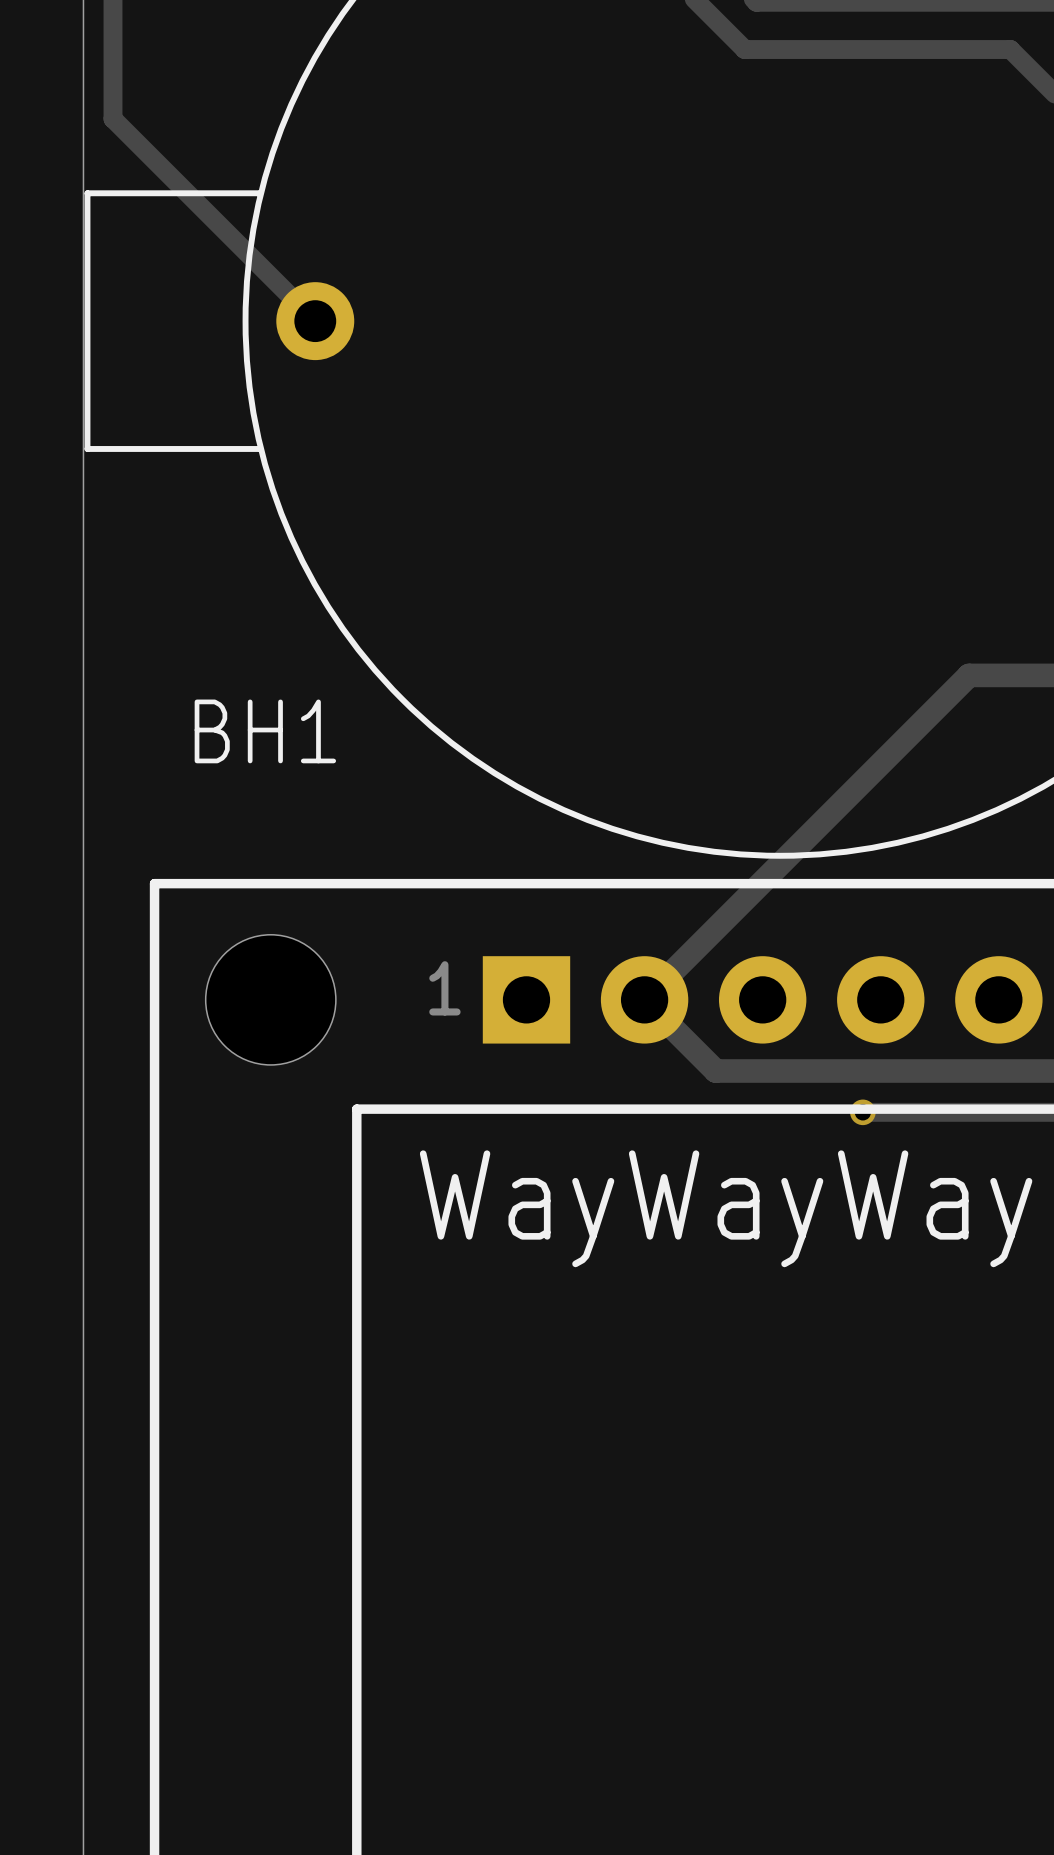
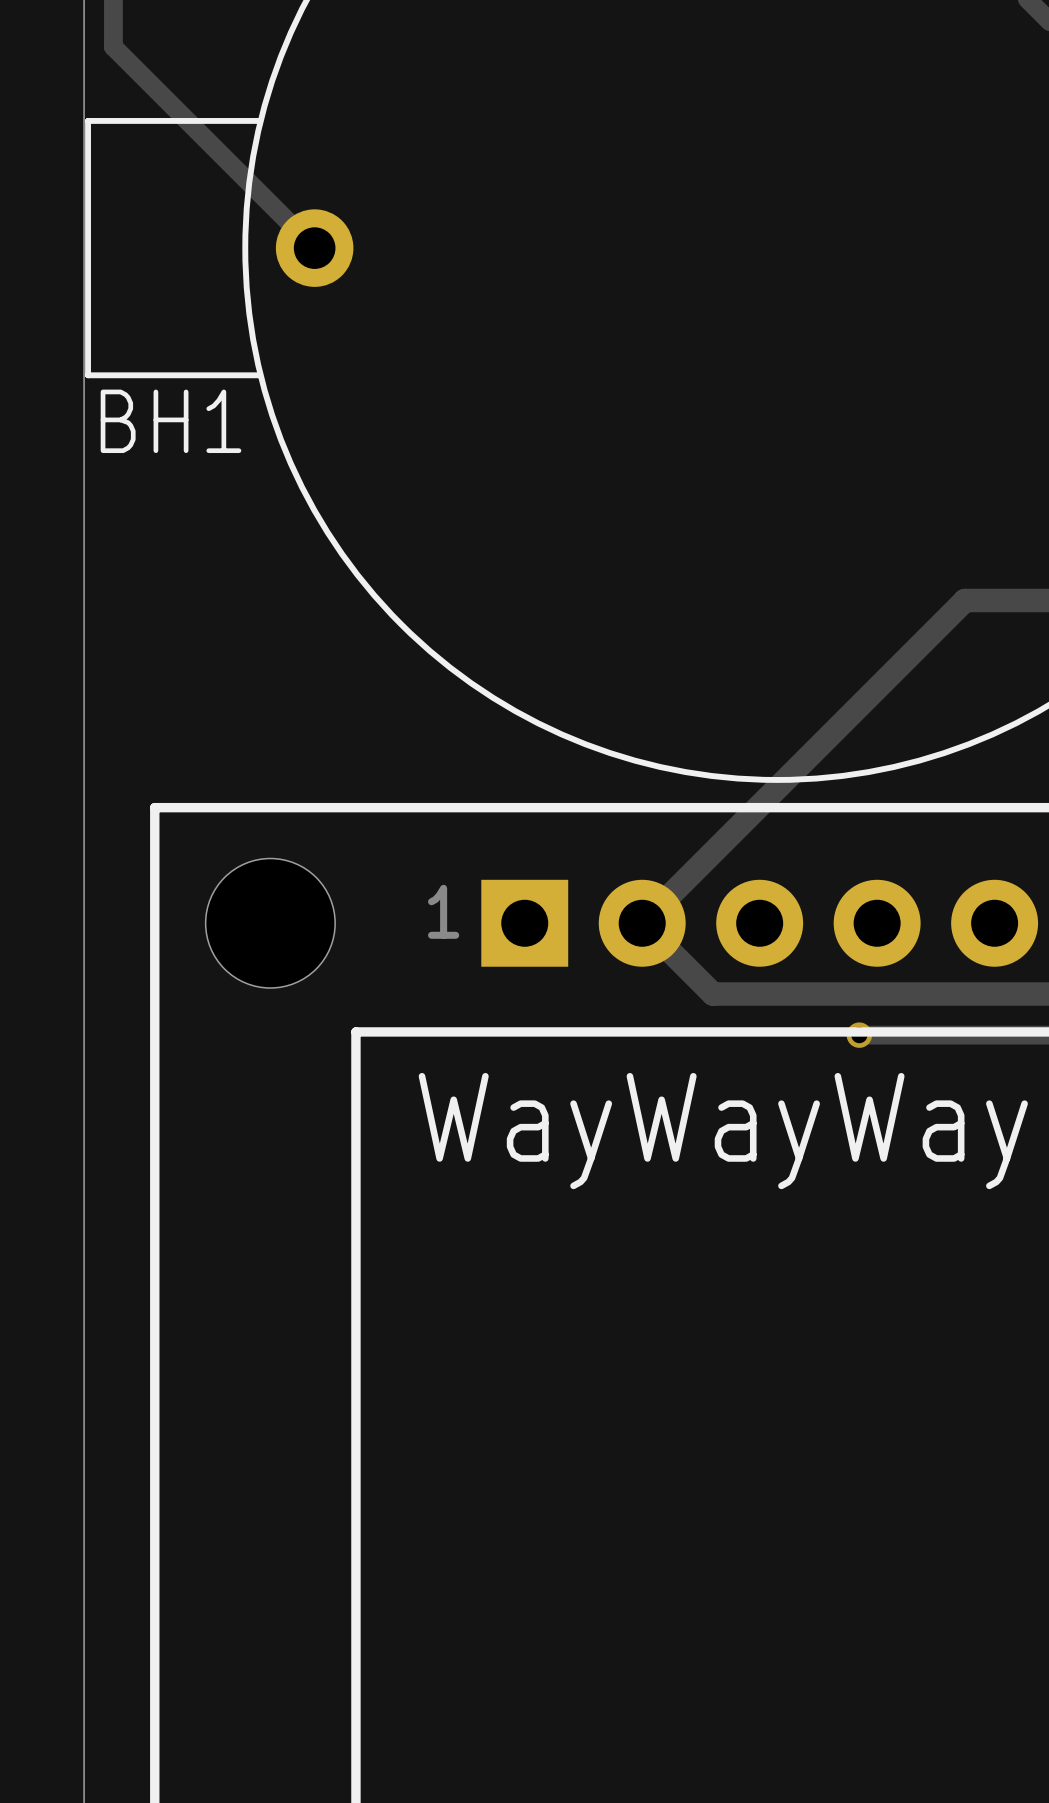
BH1 name position: BH1 (265, 731) -> BH1 (171, 421)

